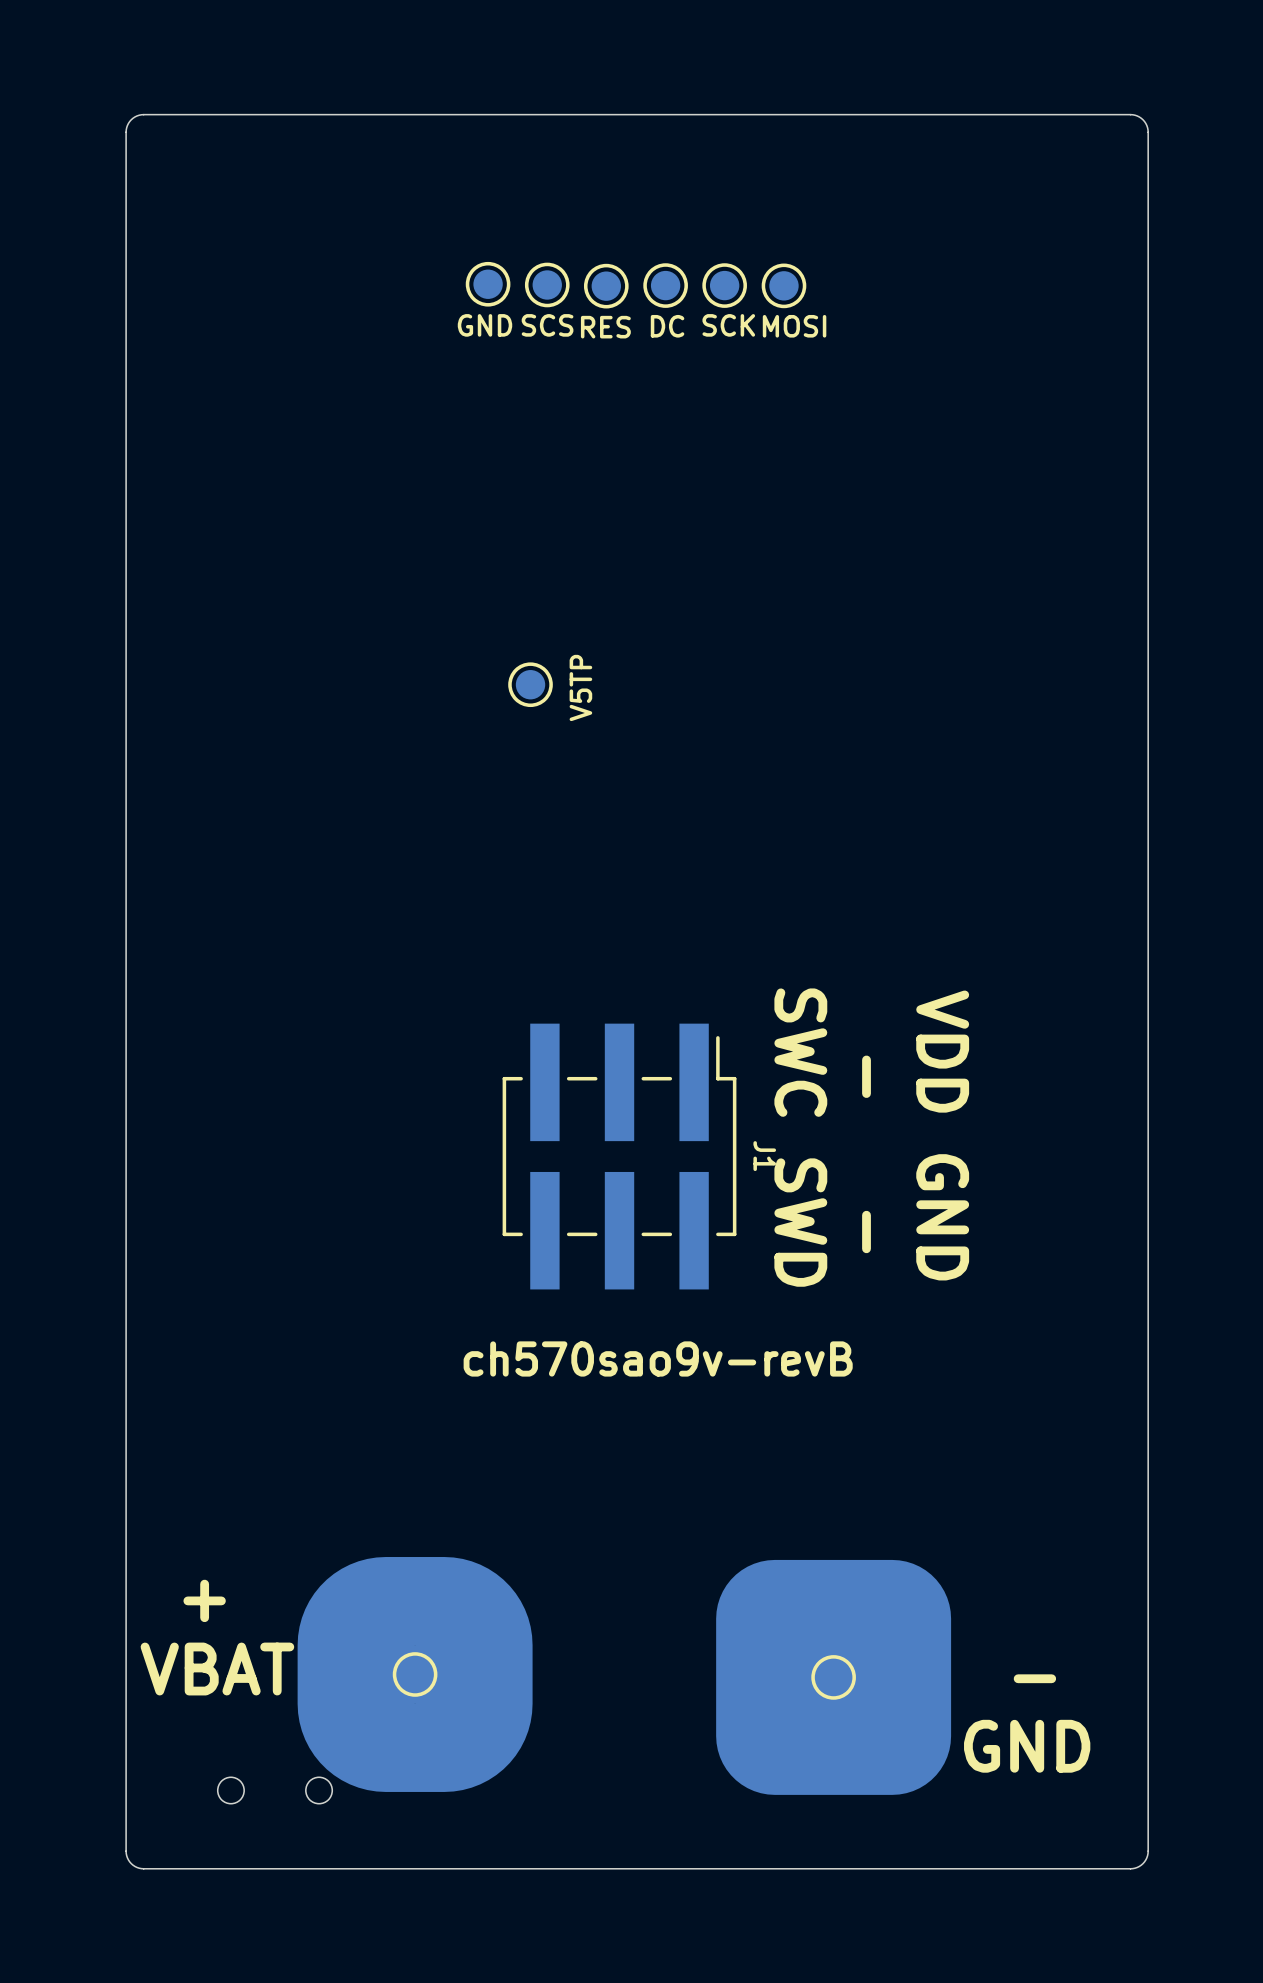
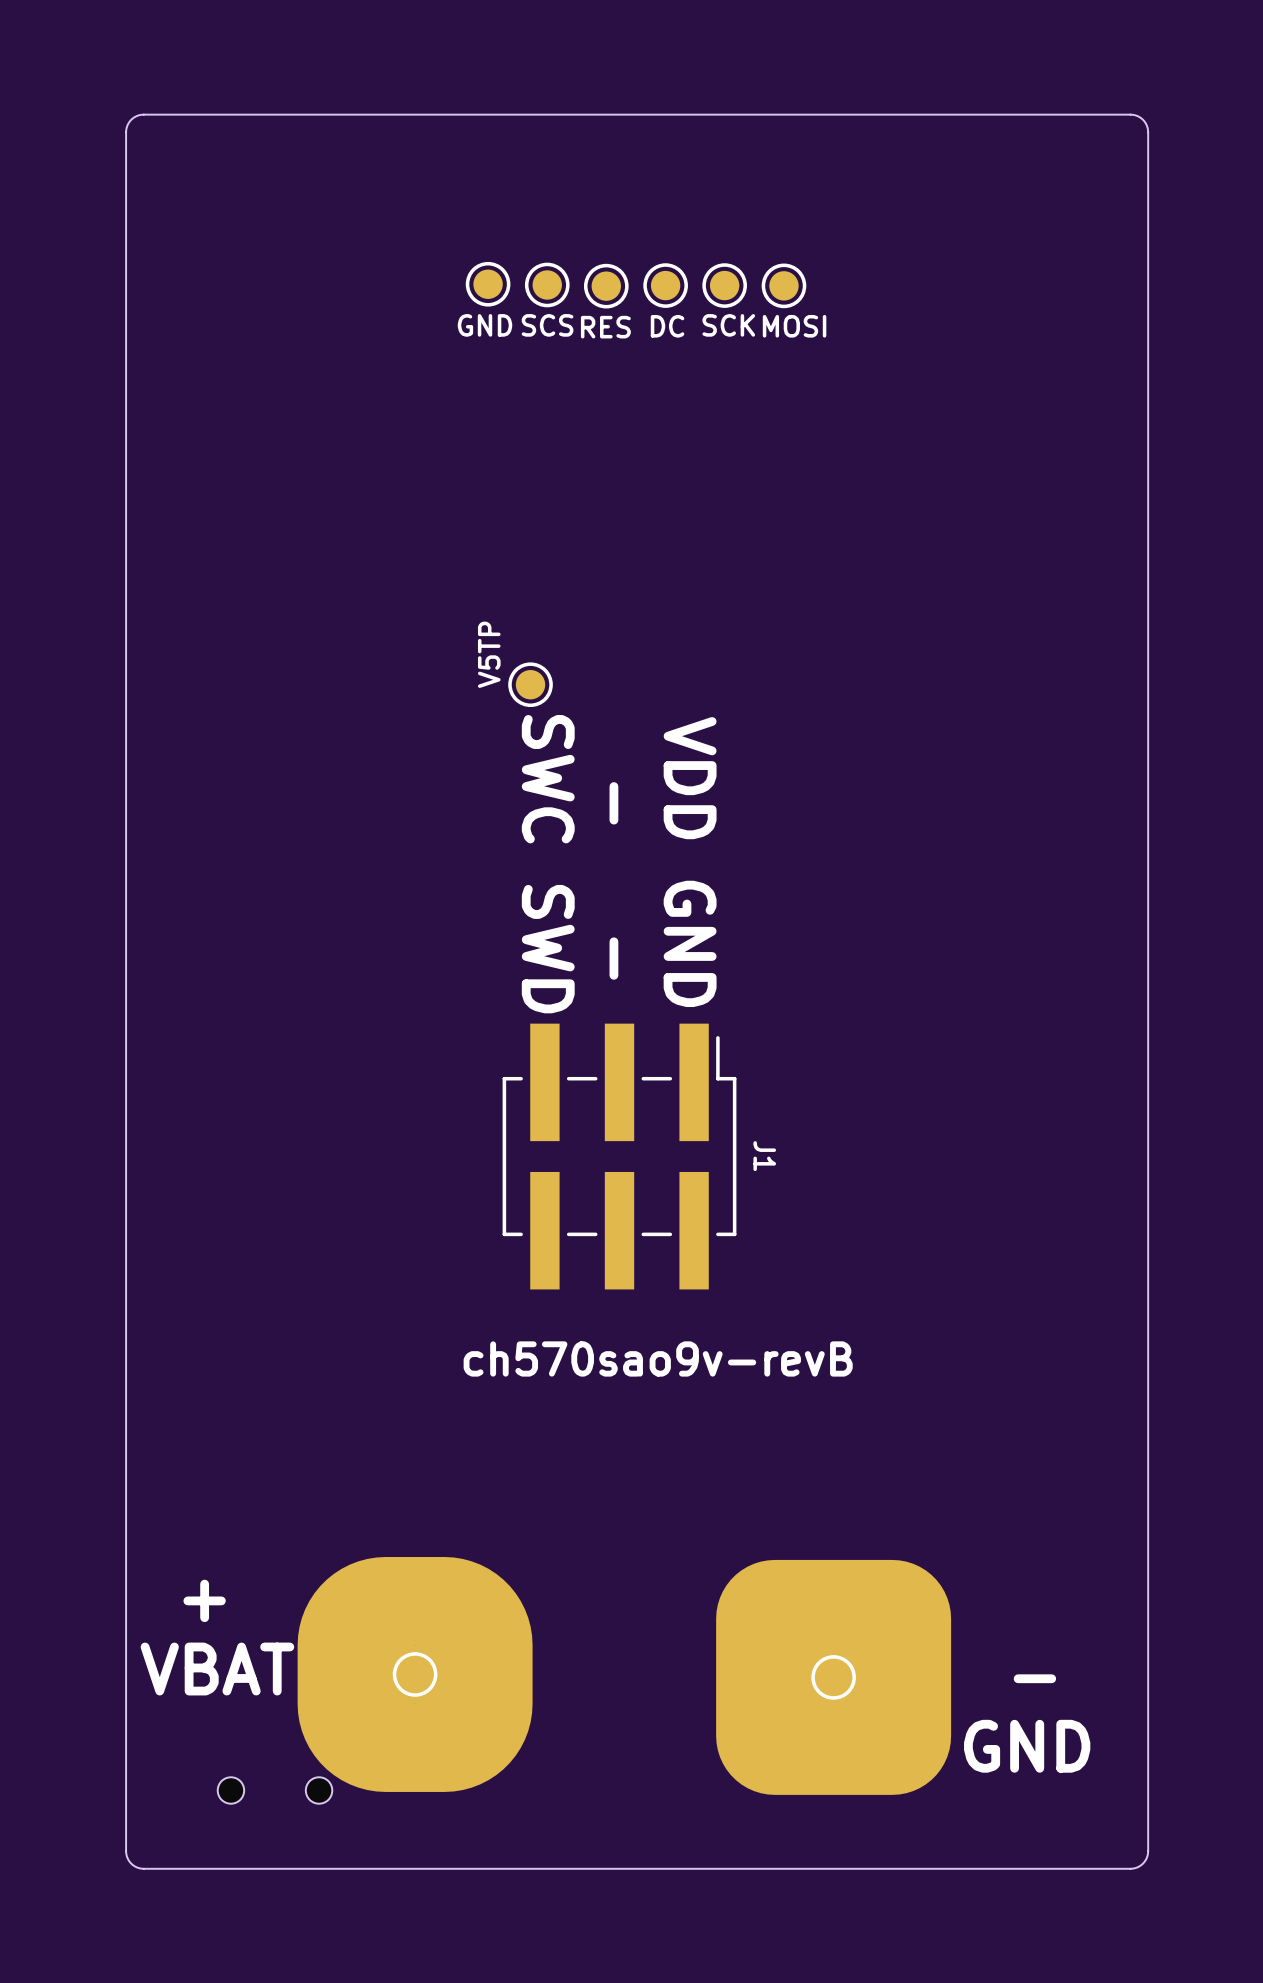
part value position: V5TP (580, 687) -> V5TP (489, 654)
text position: VDD GND (942, 1135) -> VDD GND (690, 862)
text position: SWC SWD (800, 1137) -> SWC SWD (548, 864)
text position: - - (866, 1154) -> - - (613, 880)

